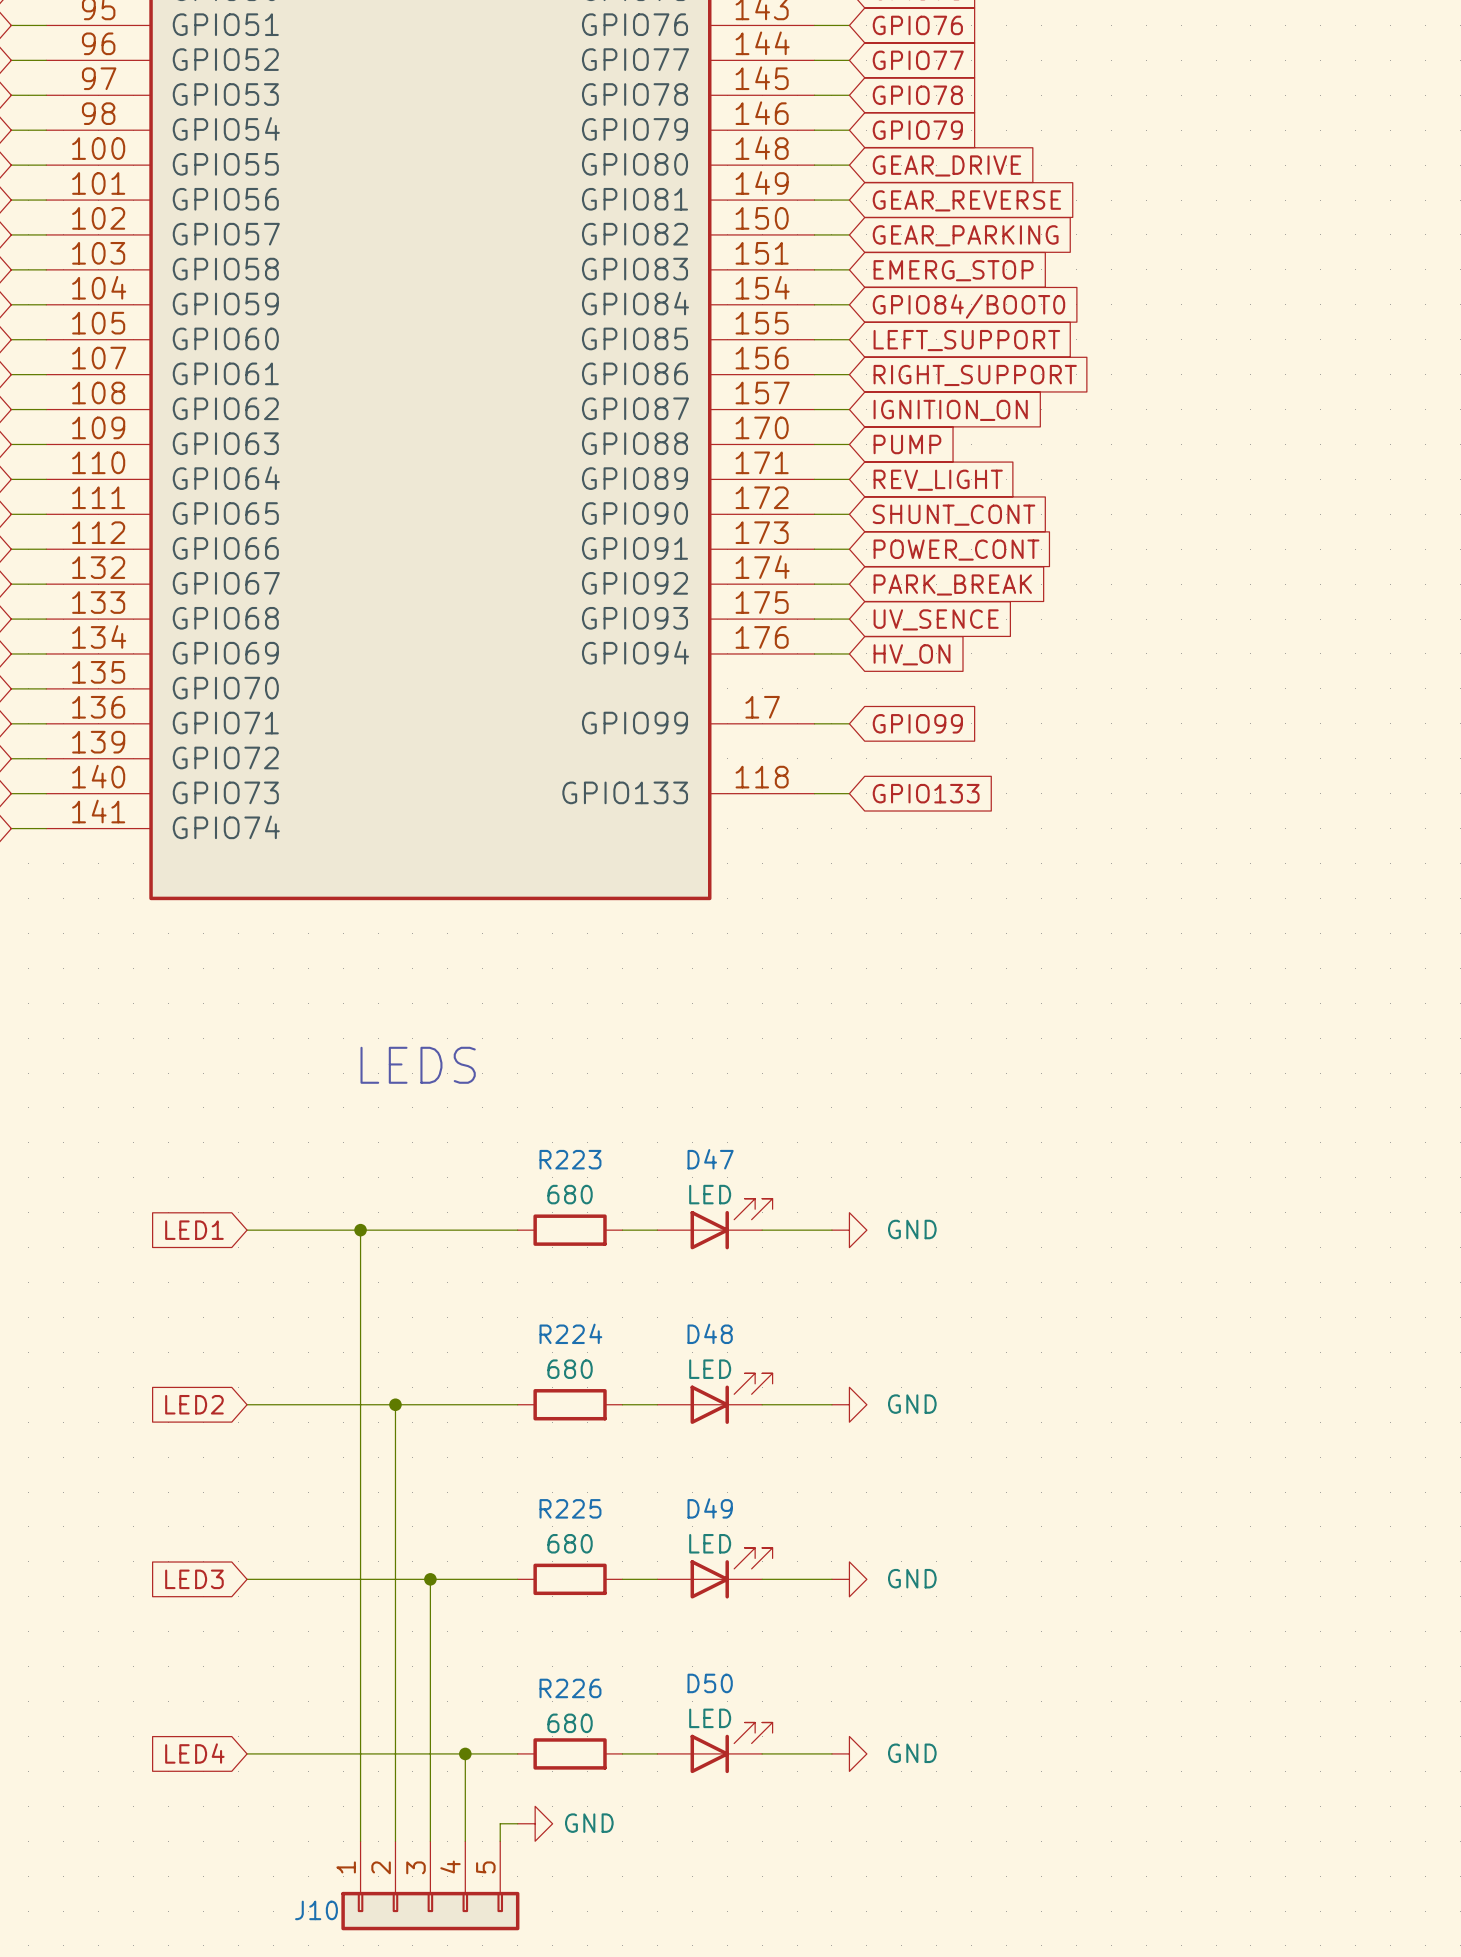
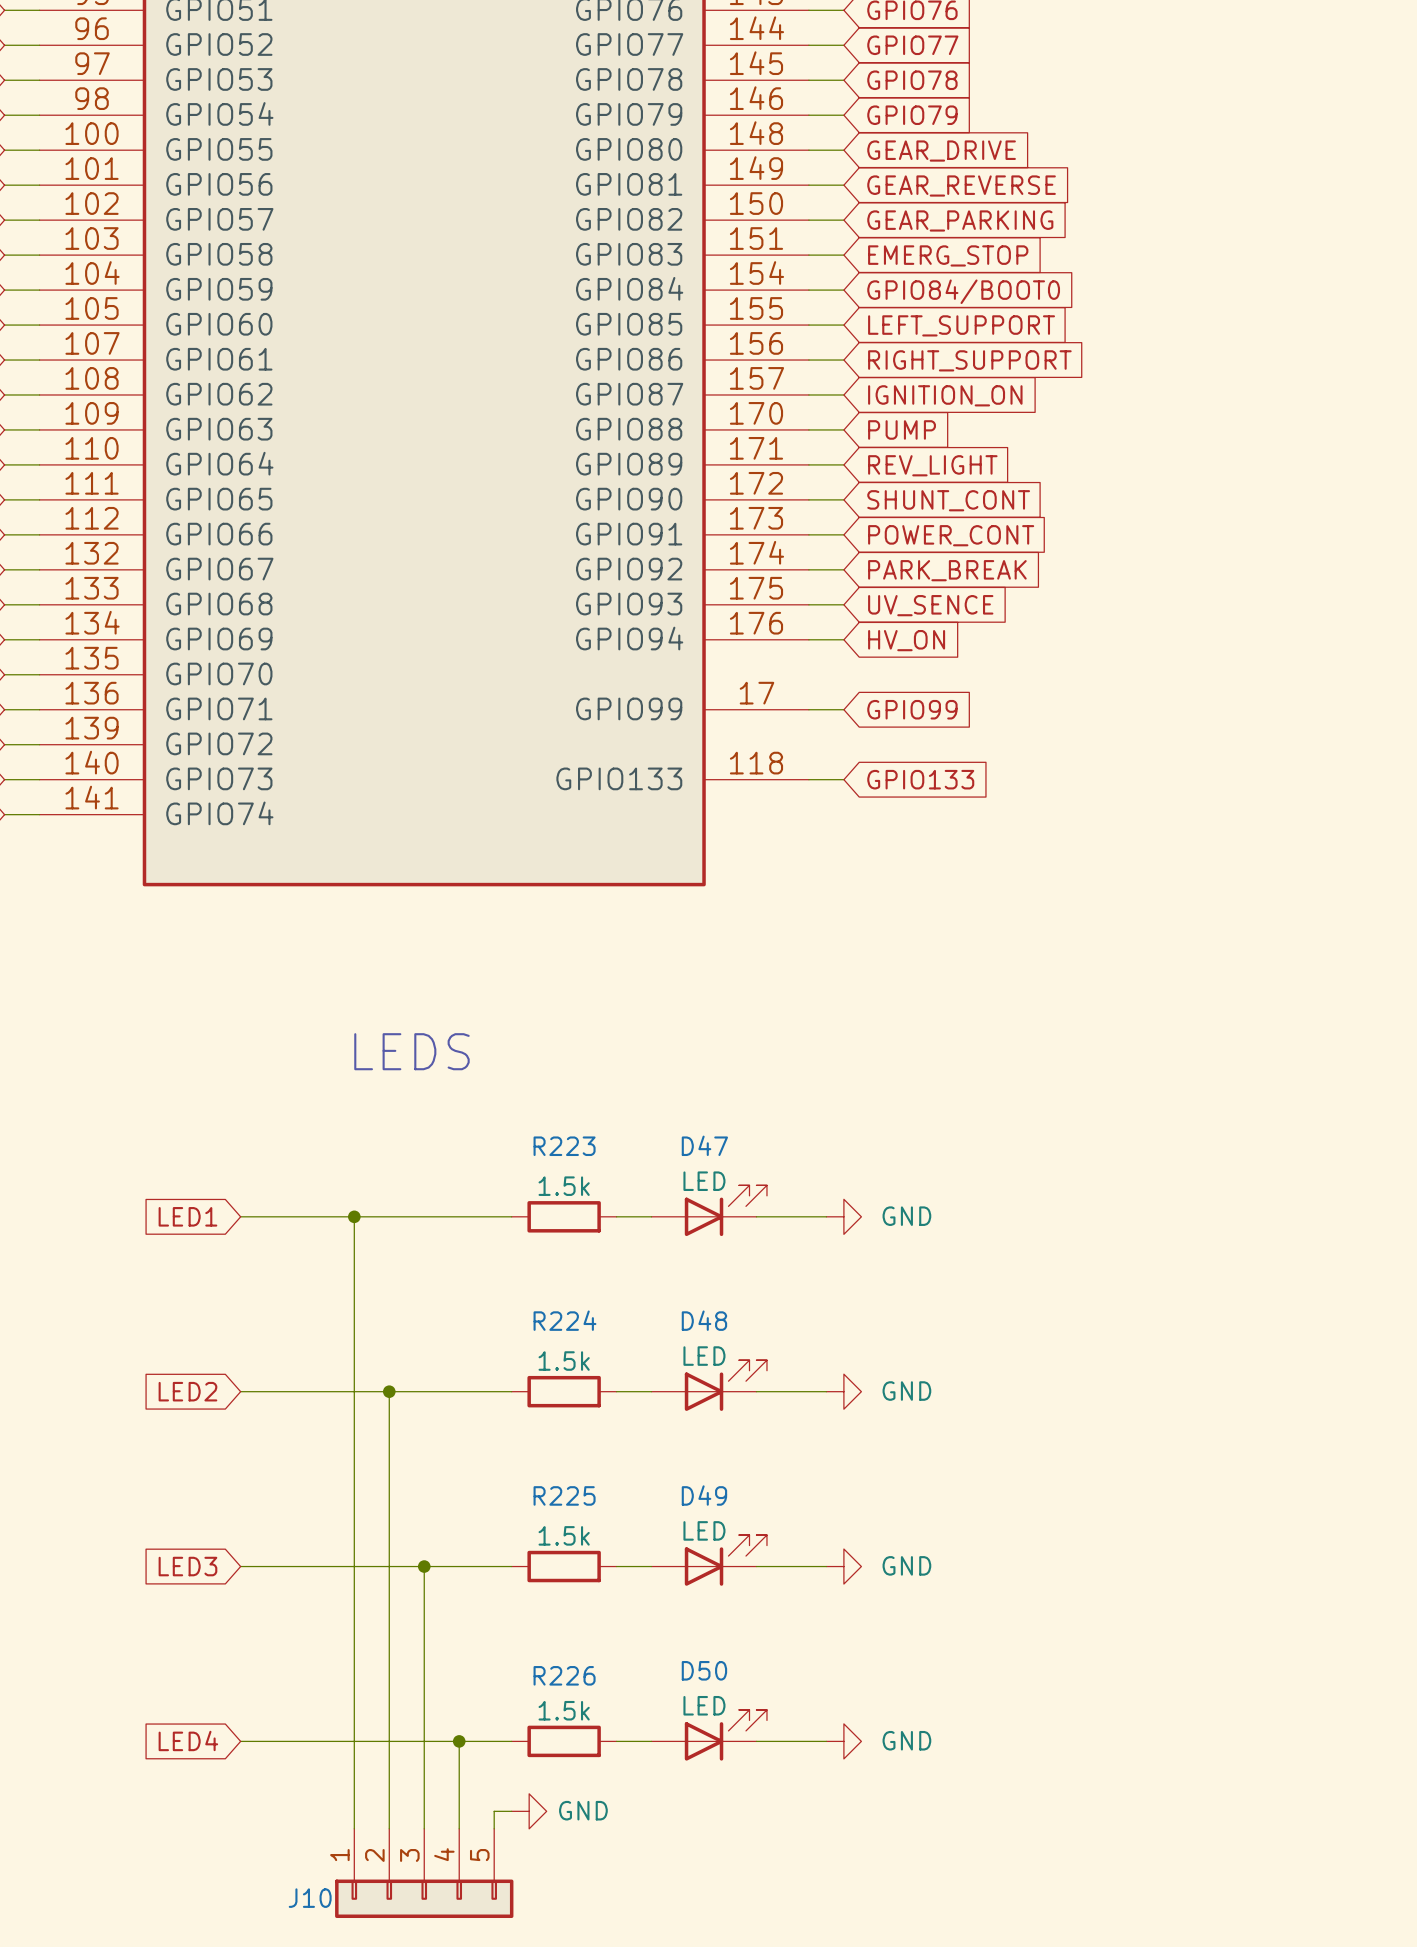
R223 value: 680 (570, 1194) -> 1.5k (564, 1186)
R224 value: 680 (570, 1369) -> 1.5k (564, 1361)
R225 value: 680 (570, 1543) -> 1.5k (564, 1535)
R226 value: 680 (570, 1723) -> 1.5k (564, 1710)

